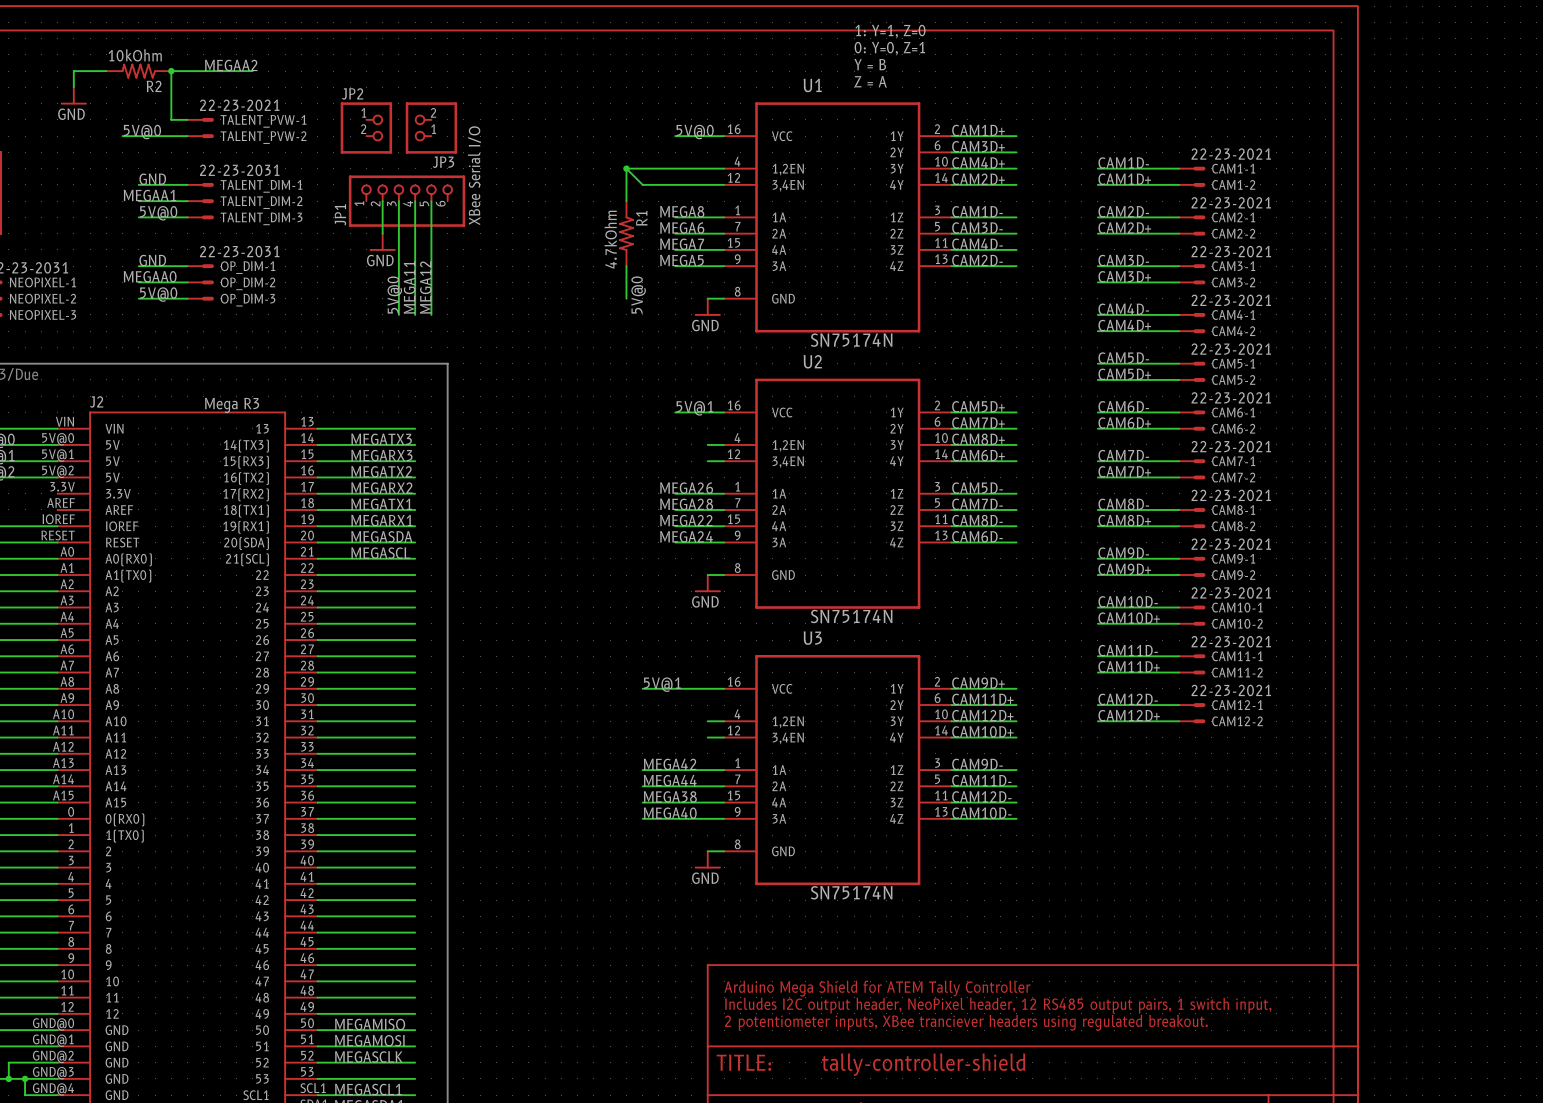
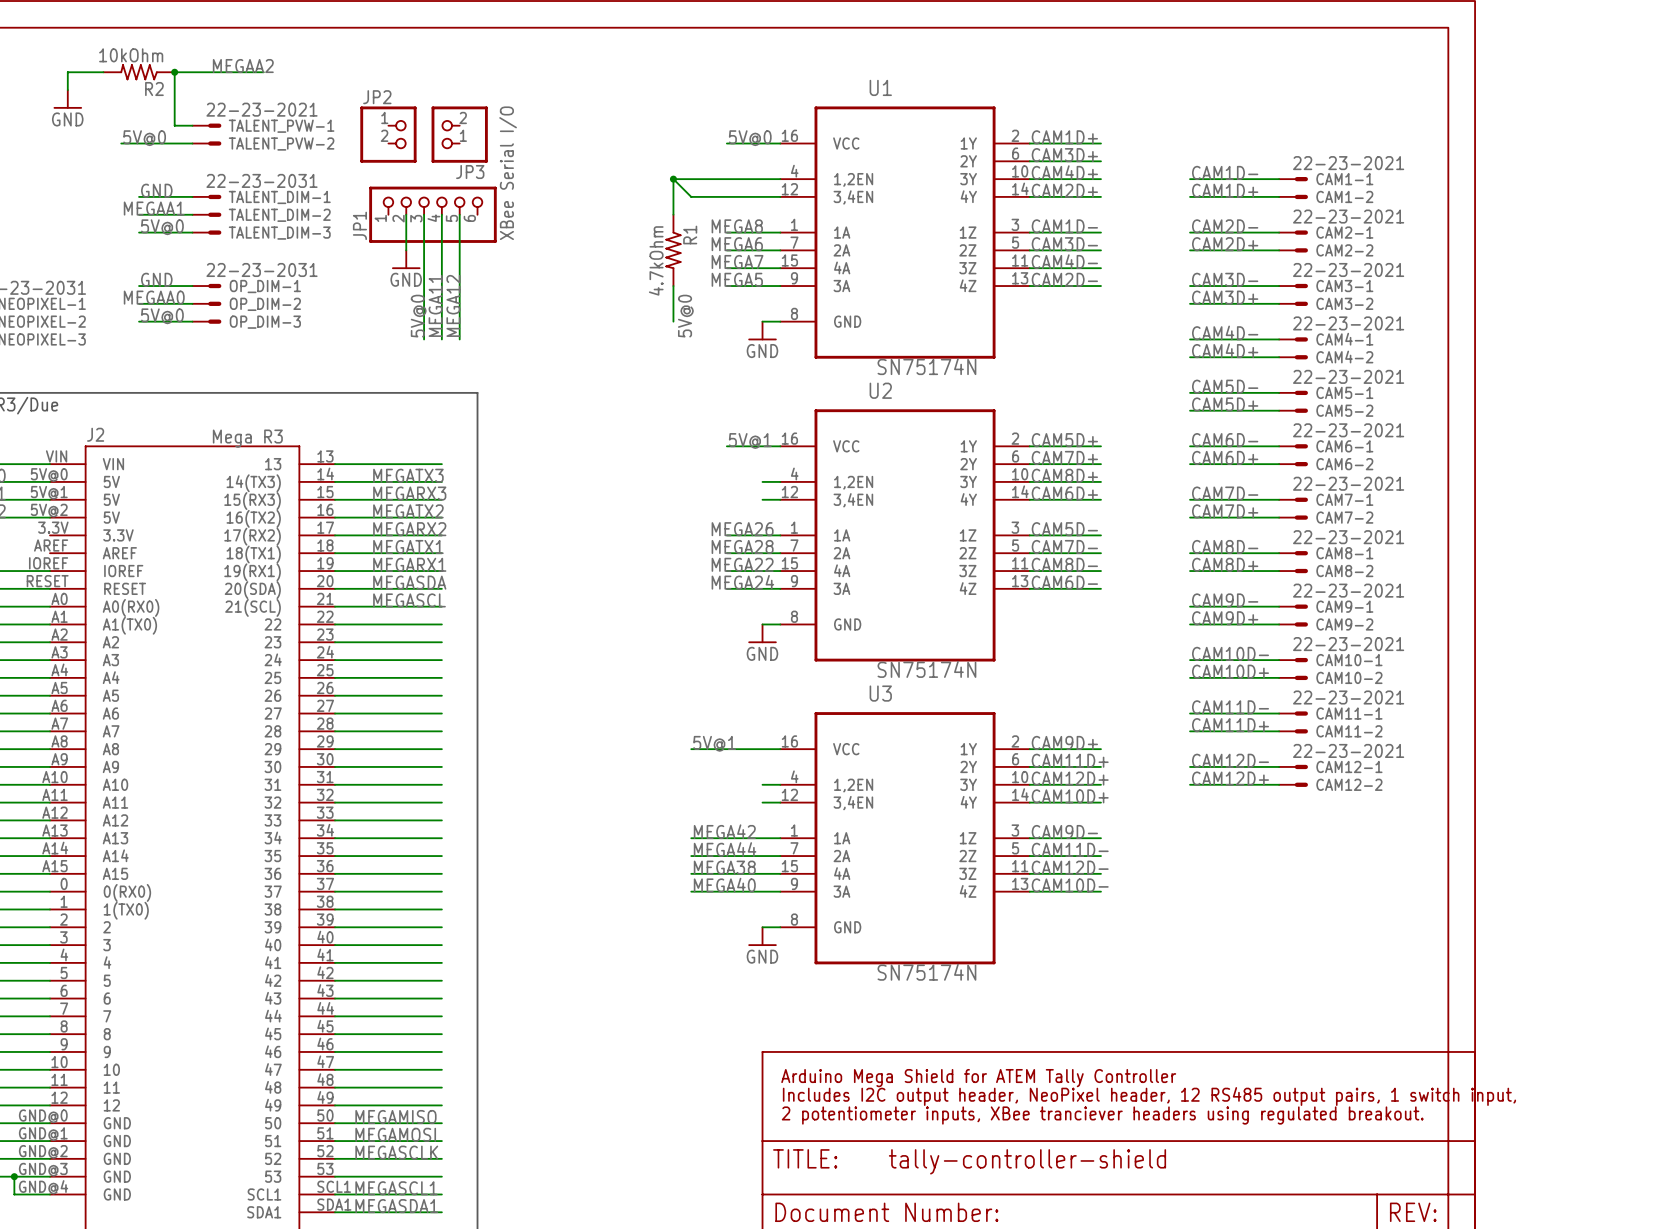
text: 1: Y=1, Z=0 (890, 31) -> none
text: 0: Y=0, Z=1 (889, 48) -> none
text: Y = B (870, 64) -> none
text: Z = A (870, 81) -> none

